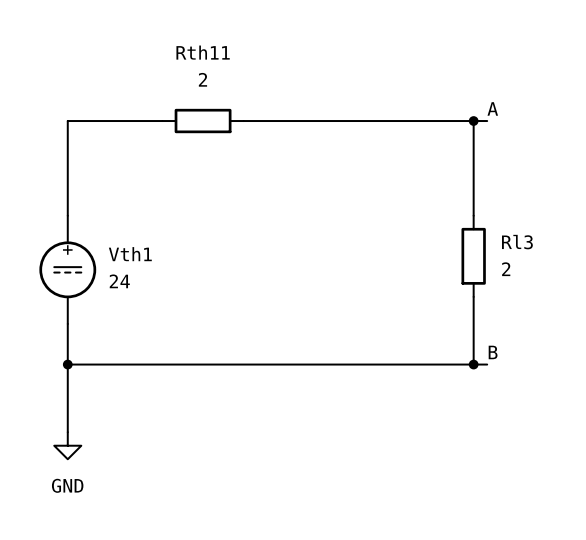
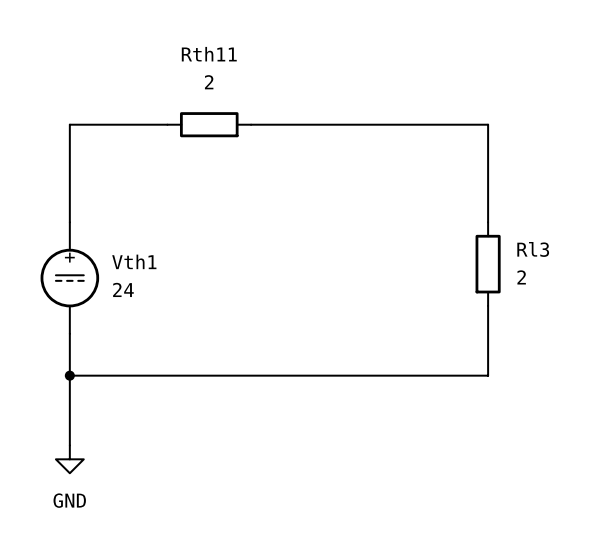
label: A (492, 108) -> none
wire: (473, 121) (487, 121) -> none
junction: (473, 121) -> none
label: B (493, 352) -> none
wire: (473, 364) (487, 364) -> none
junction: (473, 364) -> none

